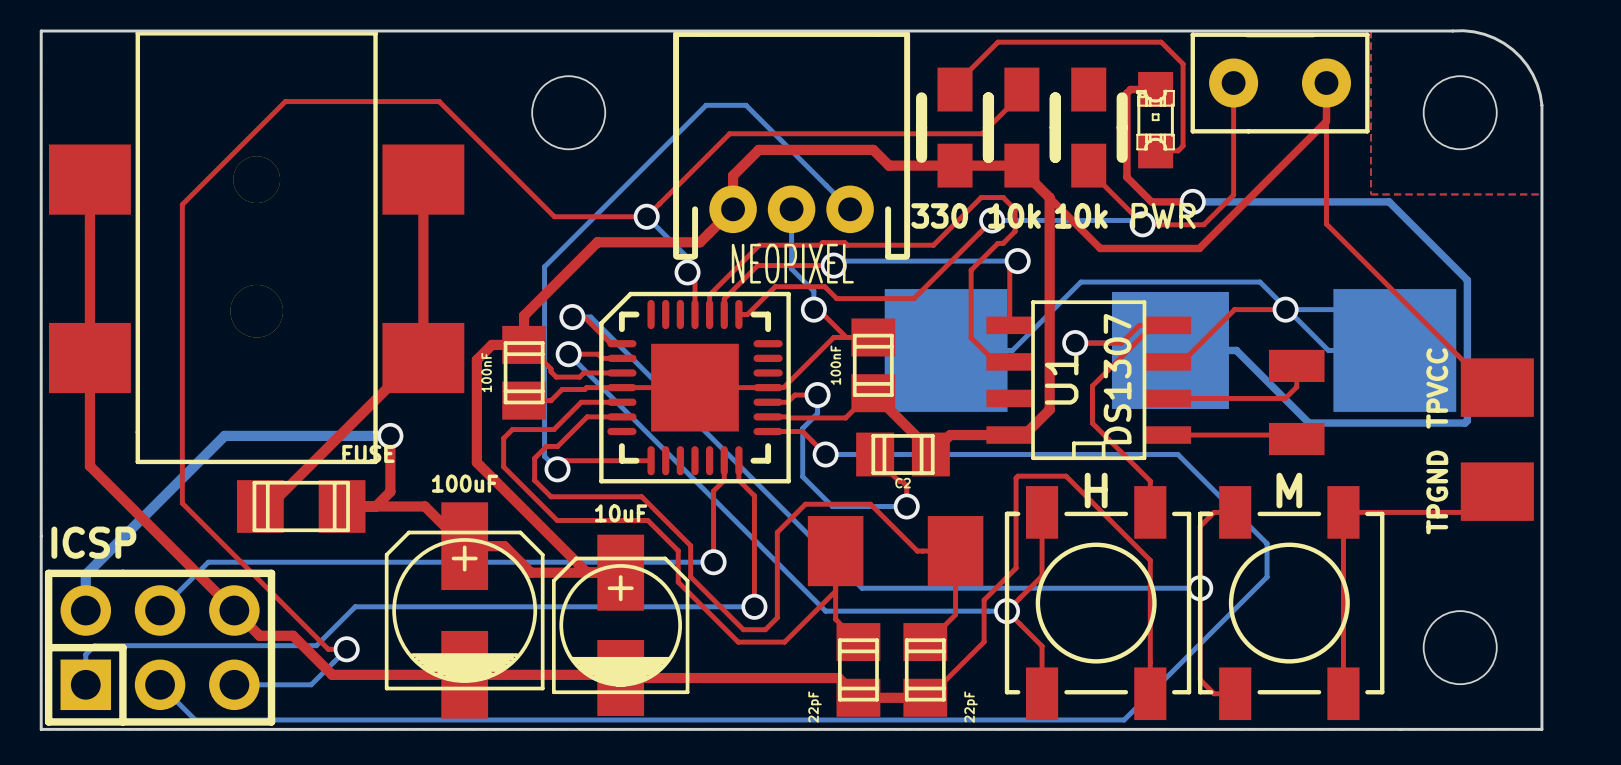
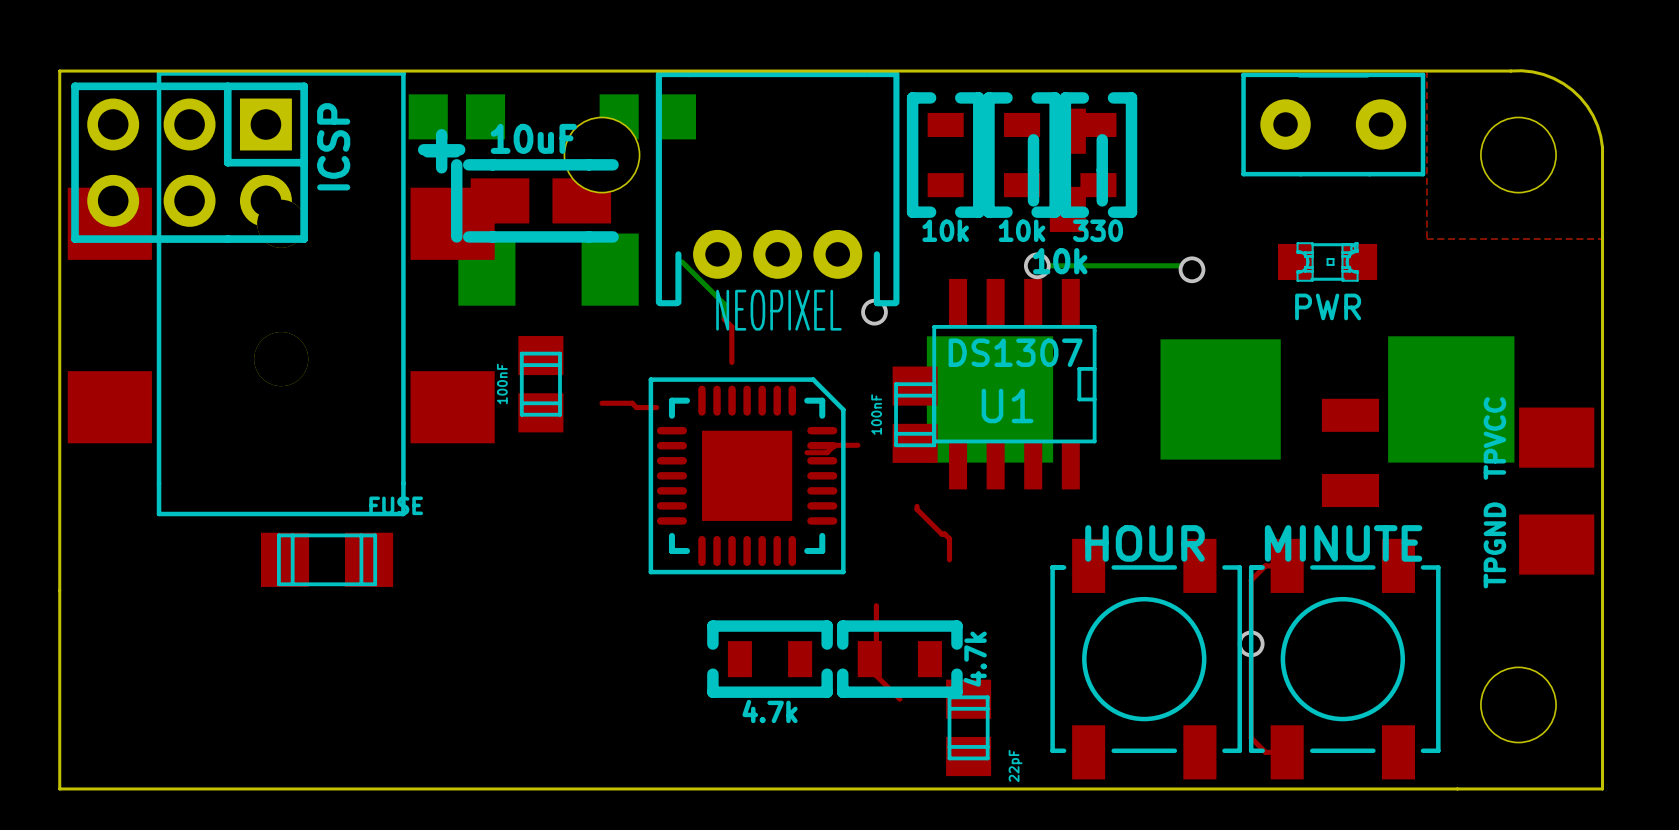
part: none -> (456, 116)
top track: (1233, 83) (1233, 194) (1203, 224) (1142, 224) -> none
top track: (955, 89) (955, 85) (998, 42) (1161, 42) (1183, 64) (1183, 145) (1178, 150) (1155, 150) -> none
top track: (1021, 89) (1021, 93) (982, 133) (729, 133) (646, 216) (554, 216) (439, 101) (285, 101) (182, 204) (182, 503) (328, 649) (346, 649) -> none
top track: (1155, 89) (1130, 89) (1126, 93) (1126, 177) (1151, 201) (1192, 201) -> none
part: none -> 10k (945, 155)
part: none -> 10k (1022, 155)
part: none -> 330 (1098, 155)
part rotation: 0° (1155, 120) -> 90° clockwise (1327, 261)
part position: (1155, 120) -> (1327, 261)
part: 330 (955, 127) -> none
part: 10k (1088, 127) -> none
part: none -> 10uF (518, 185)
part position: (791, 145) -> (777, 188)
top track: (1088, 165) (1088, 170) (1142, 223) -> none
top track: (1021, 170) (1100, 248) (1199, 248) (1326, 121) (1326, 83) (1326, 224) (1490, 387) (1497, 387) -> none
top track: (1021, 170) (1021, 165) (889, 165) (873, 149) (758, 149) (733, 175) (733, 209) (700, 242) (597, 242) (524, 315) (524, 344) -> none
top track: (1021, 170) (1049, 197) (1049, 409) (1024, 435) (950, 435) (930, 454) (930, 450) (873, 393) (870, 393) (845, 417) (768, 416) -> none
top track: (89, 179) (89, 466) (259, 635) (293, 635) (332, 674) (617, 674) (620, 678) (838, 678) (858, 697) (928, 697) (984, 641) (984, 600) (1016, 568) (1016, 478) (1018, 476) (1066, 476) (1150, 560) (1150, 693) -> none
top track: (423, 179) (423, 358) (417, 358) (269, 506) (260, 506) -> none
bottom track: (1192, 201) (1389, 201) (1467, 280) (1467, 420) (1465, 423) (1308, 423) (1236, 350) (1170, 350) (1163, 343) (1075, 343) -> none
via: (1192, 201) -> none
bottom track: (791, 209) (791, 268) (813, 291) (813, 309) -> none
bottom track: (850, 209) (746, 105) (706, 105) (544, 266) (544, 456) (557, 469) -> none
via: (646, 216) -> none
top track: (992, 220) (914, 298) (836, 298) (824, 286) (775, 286) (747, 314) (738, 314) -> none
top track: (1017, 261) (1009, 269) (1009, 325) -> none
bottom track: (1017, 261) (838, 261) (833, 265) -> none
via: (1017, 261) -> none
top track: (833, 265) (757, 265) (724, 298) (724, 314) -> none
via: (687, 272) -> none
top track: (813, 309) (818, 309) (846, 337) -> none
via: (813, 309) -> none
top track: (1285, 309) (1234, 309) (1182, 361) (1167, 361) -> none
bottom track: (1285, 309) (1353, 309) (1394, 350) (1328, 350) (1260, 282) (1080, 282) (1012, 350) (946, 350) -> none
via: (1285, 309) -> none
top track: (709, 314) (709, 294) (759, 245) (820, 245) (822, 242) (844, 242) (847, 245) (933, 245) (981, 197) (1003, 197) (1015, 209) (1015, 231) (1003, 243) (997, 243) (971, 270) (971, 337) (995, 361) (1009, 361) -> none
top track: (572, 317) (584, 317) (610, 343) (621, 343) -> none
bottom track: (572, 317) (590, 317) (861, 588) (1200, 588) -> none
via: (572, 317) -> none
top track: (1153, 325) (1092, 385) (1092, 423) (1150, 481) (1150, 512) -> none
top track: (1167, 325) (1139, 325) (1121, 343) (1075, 343) -> none
top track: (873, 337) (833, 337) (783, 387) (586, 387) (584, 389) (562, 389) (551, 400) (524, 400) -> none
via: (1075, 343) -> none
top track: (524, 344) (527, 344) (551, 368) (551, 371) (556, 377) (579, 377) (583, 372) (621, 372) -> none
top track: (524, 344) (491, 344) (476, 359) (476, 462) (587, 572) -> none
bottom track: (568, 354) (825, 611) (1007, 611) -> none
via: (568, 354) -> none
top track: (1296, 365) (1296, 386) (1285, 398) (1167, 398) -> none
part position: (524, 372) -> (540, 384)
U1 rotation: 0° (1088, 380) -> 90° counterclockwise (1014, 384)
U1 position: (1088, 380) -> (1014, 384)
part rotation: 0° (694, 387) -> 90° clockwise (747, 475)
bottom track: (817, 395) (817, 413) (802, 428) (802, 476) (832, 506) (906, 506) -> none
via: (817, 395) -> none
top track: (621, 402) (581, 402) (553, 429) (512, 429) (503, 438) (503, 466) (557, 520) (647, 520) (678, 550) (678, 582) (738, 642) (784, 642) (835, 591) -> none
top track: (621, 416) (587, 416) (557, 446) (546, 446) (534, 458) (534, 480) (551, 496) (641, 496) (690, 545) (690, 576) (743, 629) (765, 629) (777, 617) (777, 532) (805, 504) (870, 504) (917, 551) (955, 551) (955, 614) (928, 642) (925, 642) -> none
top track: (768, 431) (802, 431) (825, 454) -> none
top track: (390, 435) (390, 491) (375, 506) -> none
bottom track: (390, 435) (224, 435) (85, 574) (85, 610) -> none
via: (390, 435) -> none
top track: (1167, 435) (1292, 435) (1296, 439) -> none
bottom track: (825, 454) (1177, 454) (1267, 543) (1267, 577) (1124, 719) (195, 719) (160, 684) -> none
via: (825, 454) -> none
C2: (903, 454) -> none
top track: (651, 460) (566, 460) (557, 469) -> none
top track: (724, 460) (724, 480) (713, 491) (713, 562) -> none
top track: (738, 460) (738, 480) (754, 495) (754, 606) -> none
via: (557, 469) -> none
part value: H (1096, 490) -> HOUR (1144, 543)
part value: M (1289, 490) -> MINUTE (1343, 543)
top track: (1497, 491) (1476, 512) (1343, 512) (1343, 693) -> none
top track: (342, 506) (425, 506) (464, 546) (504, 546) (530, 572) (620, 572) -> none
via: (906, 506) -> none
top track: (1042, 512) (1042, 576) (1007, 611) (1042, 646) (1042, 693) -> none
part value position: ICSP (93, 542) -> ICSP (333, 146)
part side: top (895, 551) -> bottom (548, 269)
bottom track: (713, 562) (208, 562) (160, 610) -> none
via: (713, 562) -> none
part: none -> 4.7k (770, 659)
part: none -> 4.7k (899, 659)
bottom track: (754, 606) (355, 606) (316, 645) (94, 645) (85, 654) (85, 684) -> none
via: (754, 606) -> none
part: 100uF (464, 610) -> none
via: (1007, 611) -> none
part: 10uF (620, 625) -> none
part rotation: 0° (160, 647) -> 180° (189, 162)
part position: (160, 647) -> (189, 162)
bottom track: (346, 649) (311, 684) (234, 684) -> none
via: (346, 649) -> none
part side: top (858, 669) -> bottom (647, 116)

